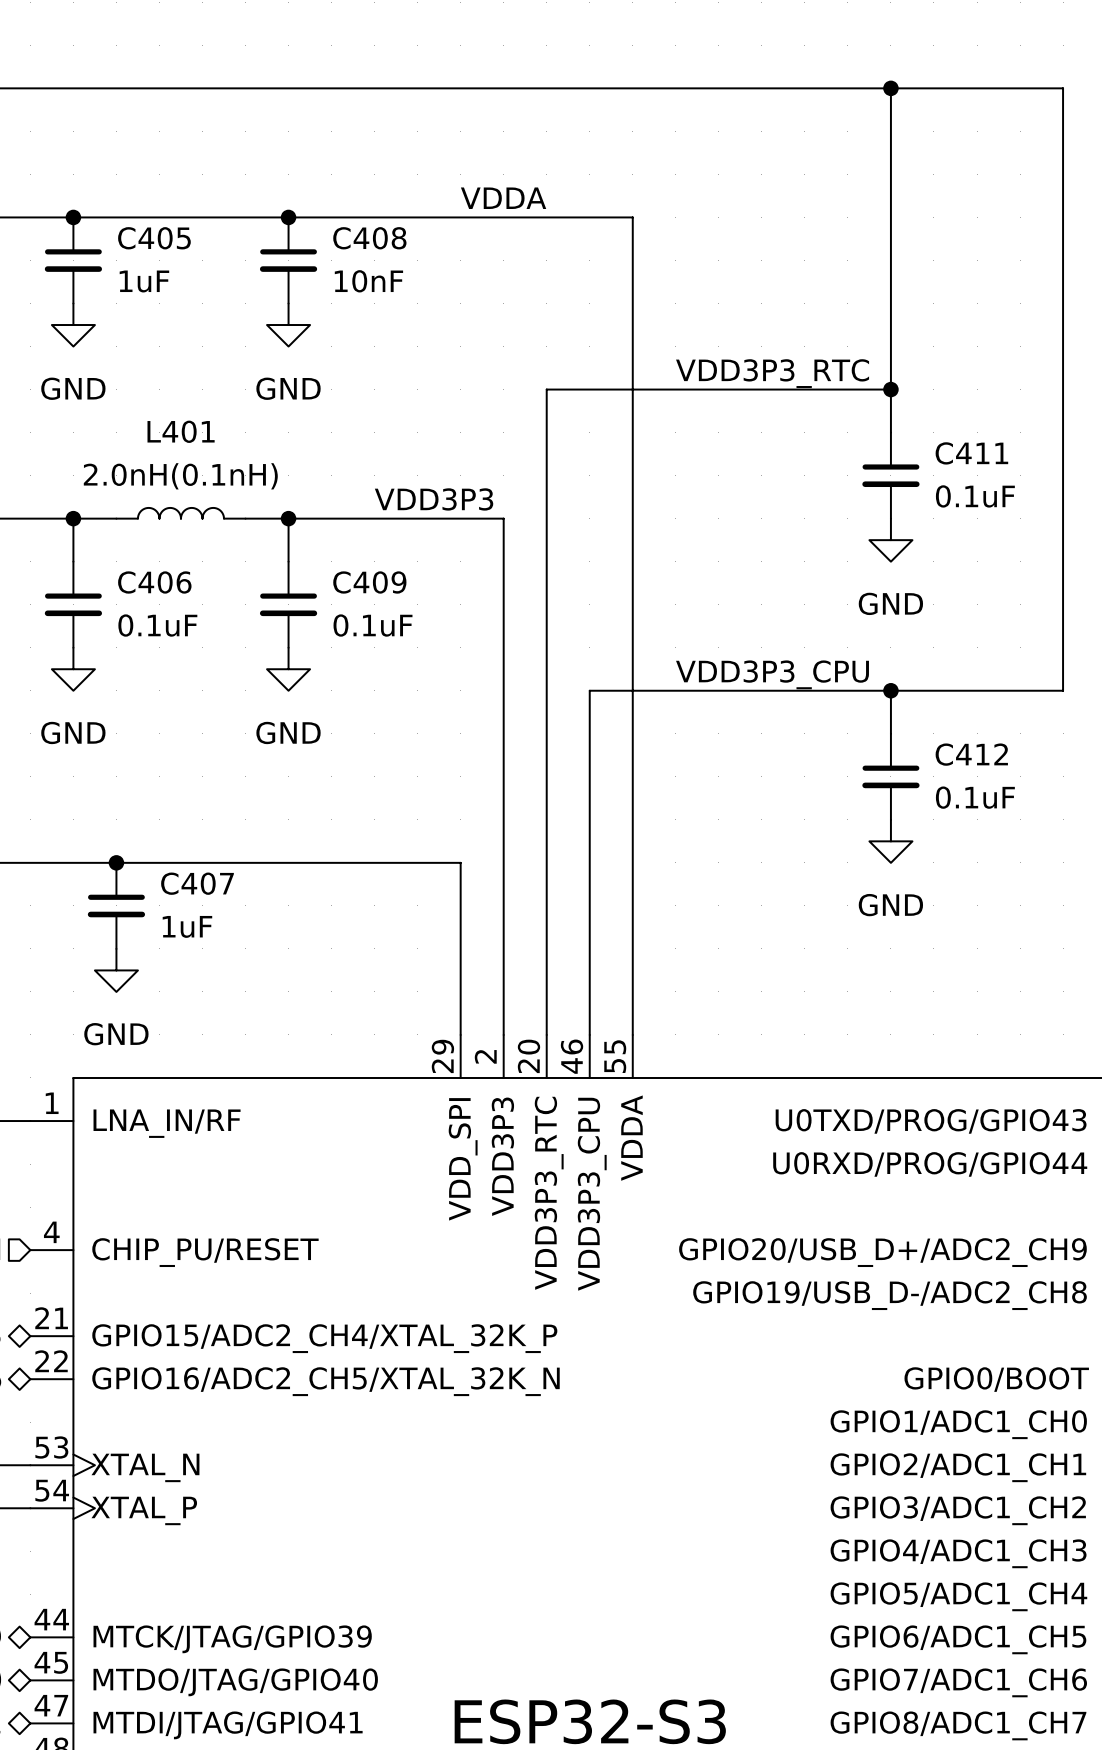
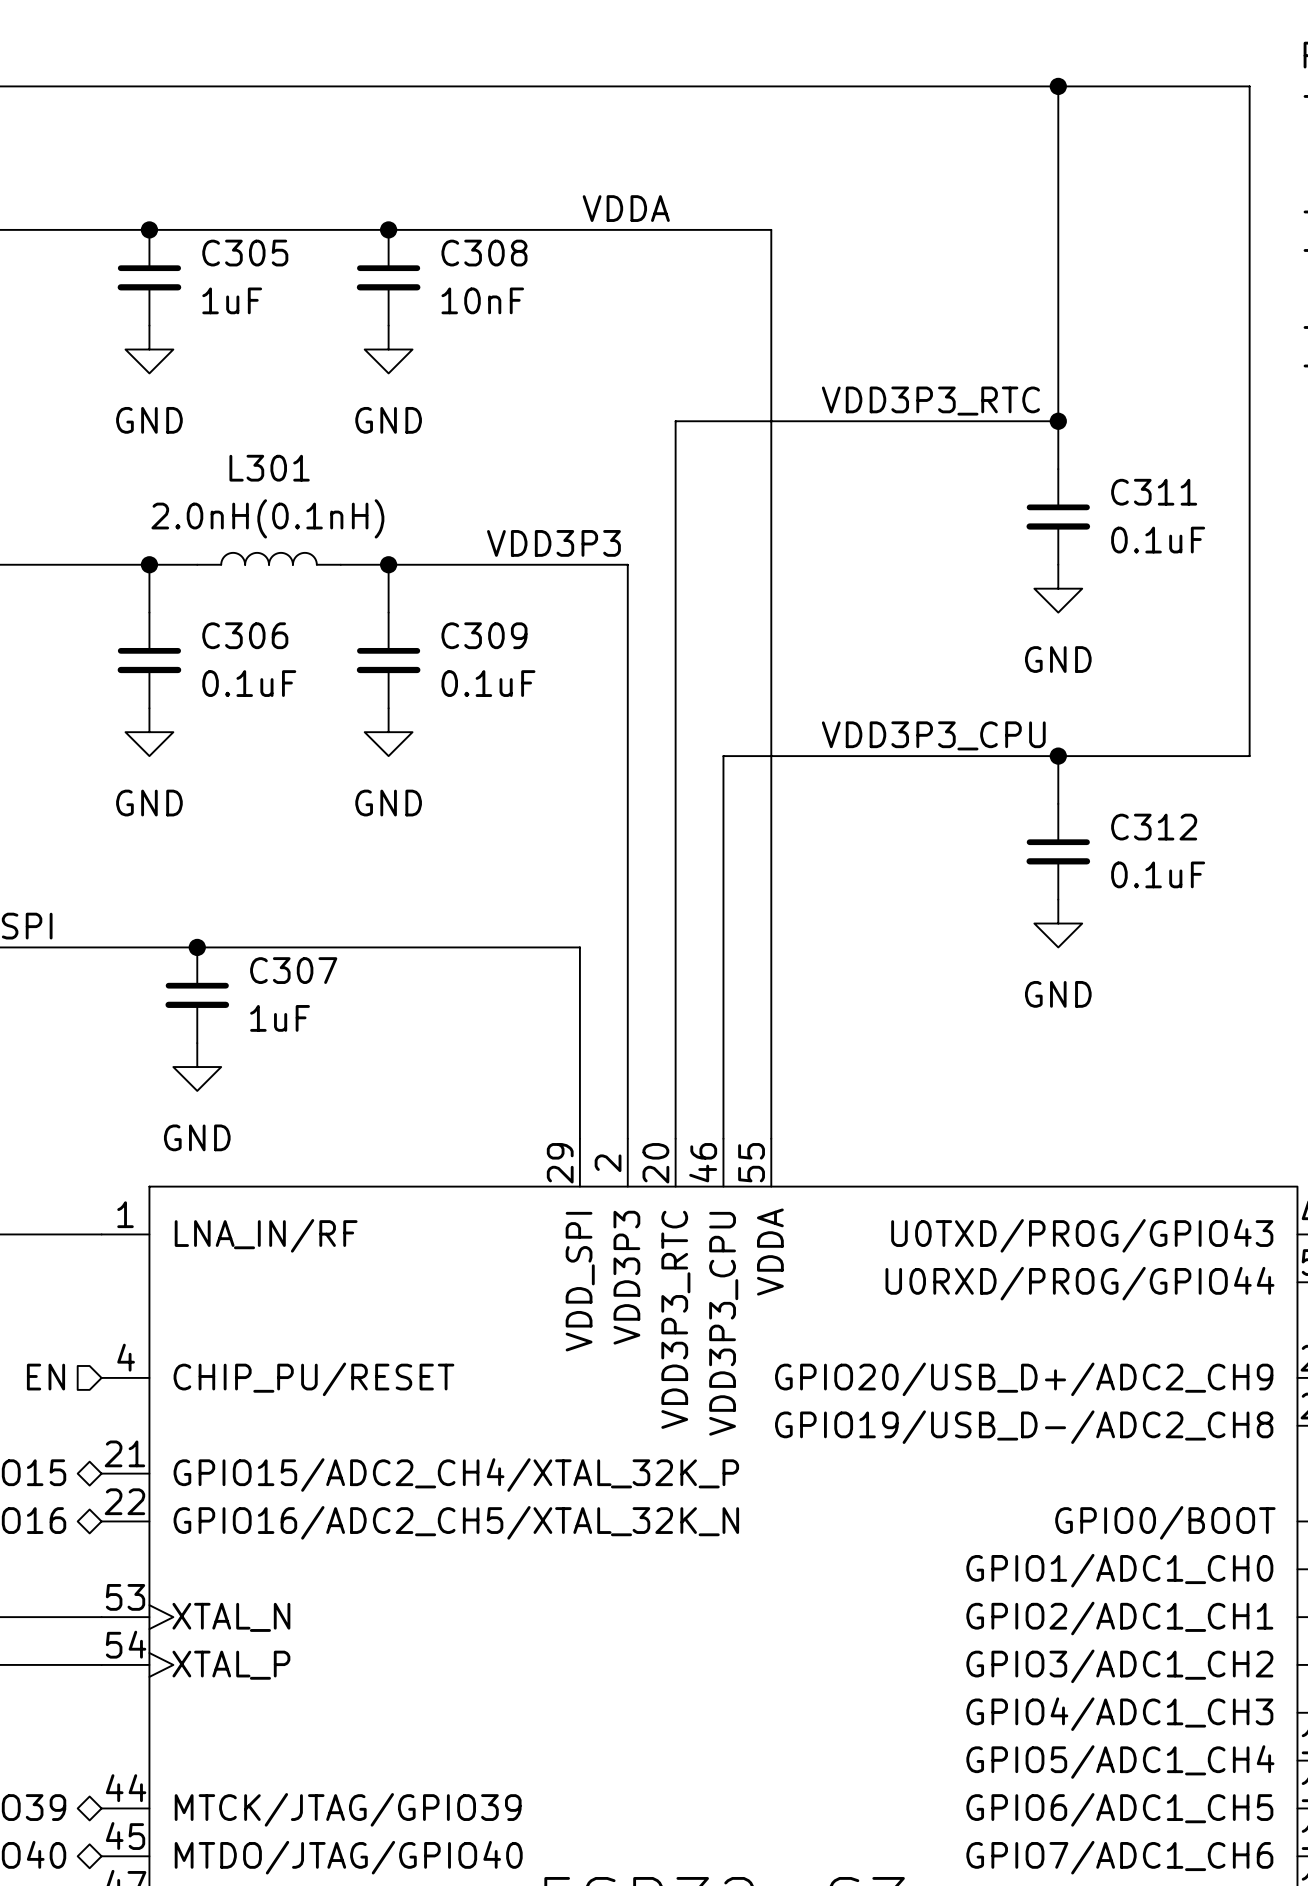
C405 name: C405 (154, 238) -> C305 (245, 253)
C408 name: C408 (369, 238) -> C308 (484, 253)
L401 name: L401 (181, 431) -> L301 (269, 468)
C411 name: C411 (971, 453) -> C311 (1154, 492)
C406 name: C406 (154, 582) -> C306 (245, 635)
C409 name: C409 (369, 582) -> C309 (484, 635)
C412 name: C412 (971, 754) -> C312 (1154, 827)
C407 name: C407 (197, 883) -> C307 (293, 970)

